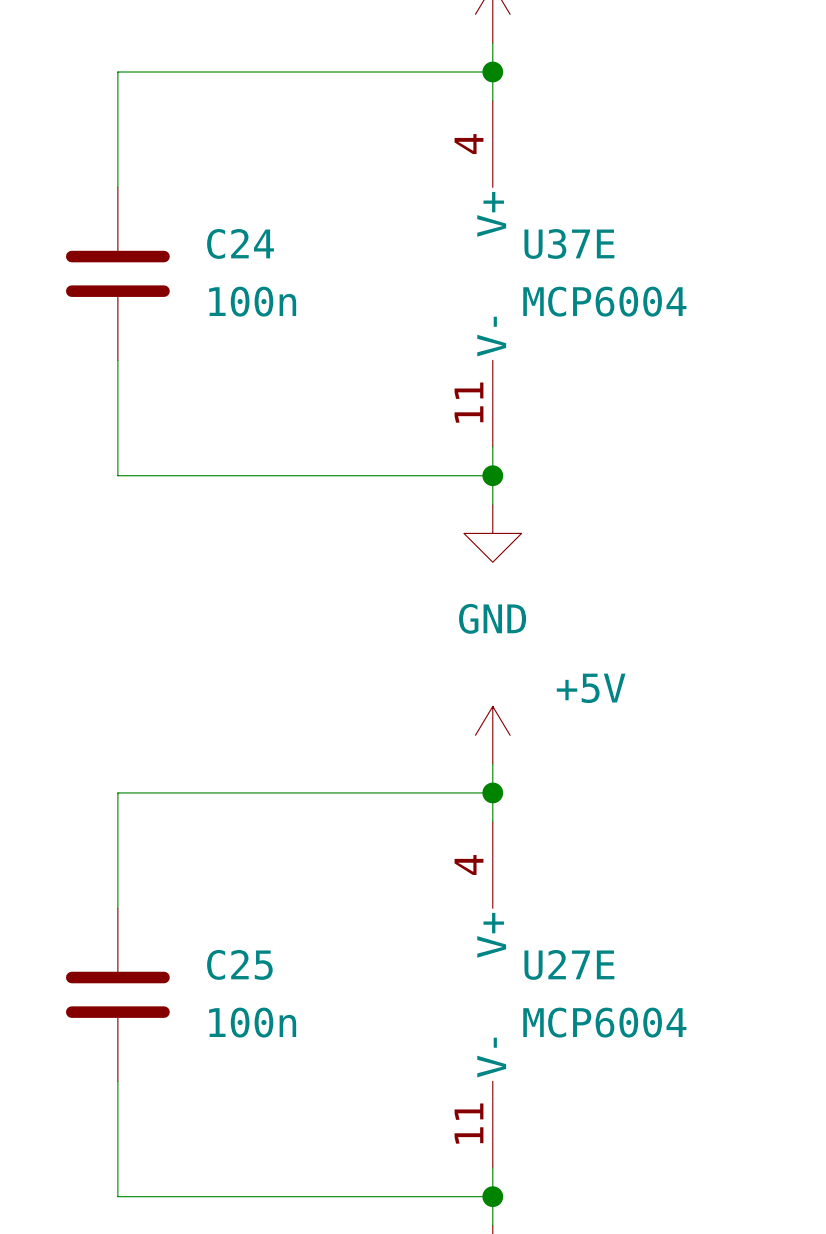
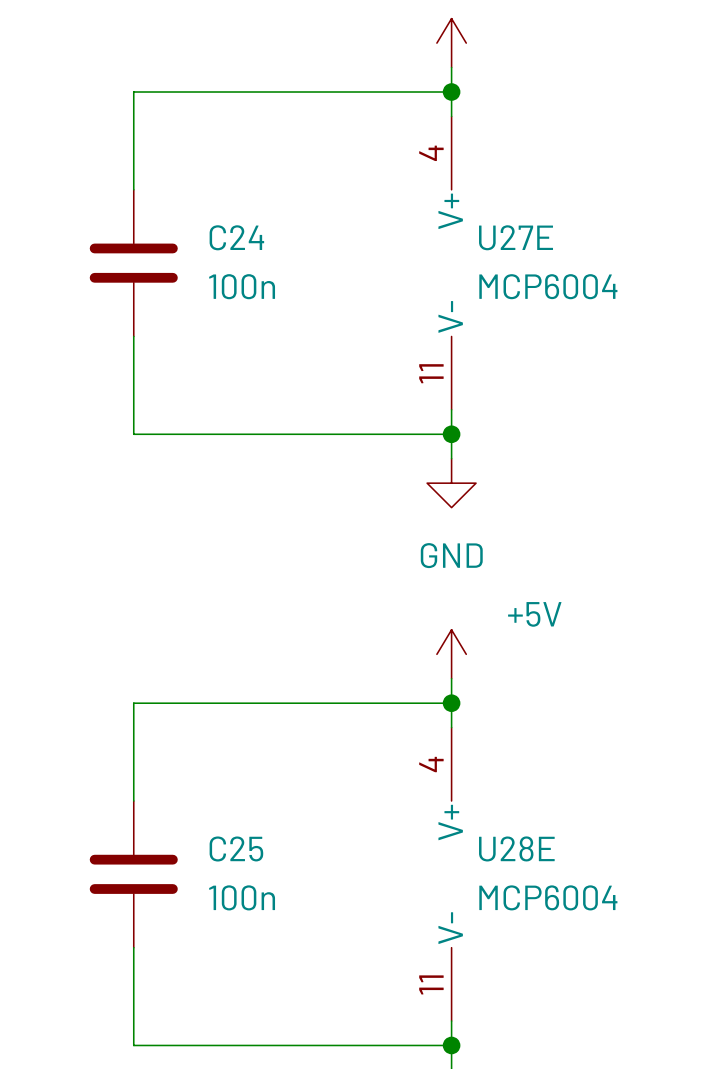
U37E name: U37E (569, 243) -> U27E (516, 237)
U27E name: U27E (569, 964) -> U28E (516, 848)

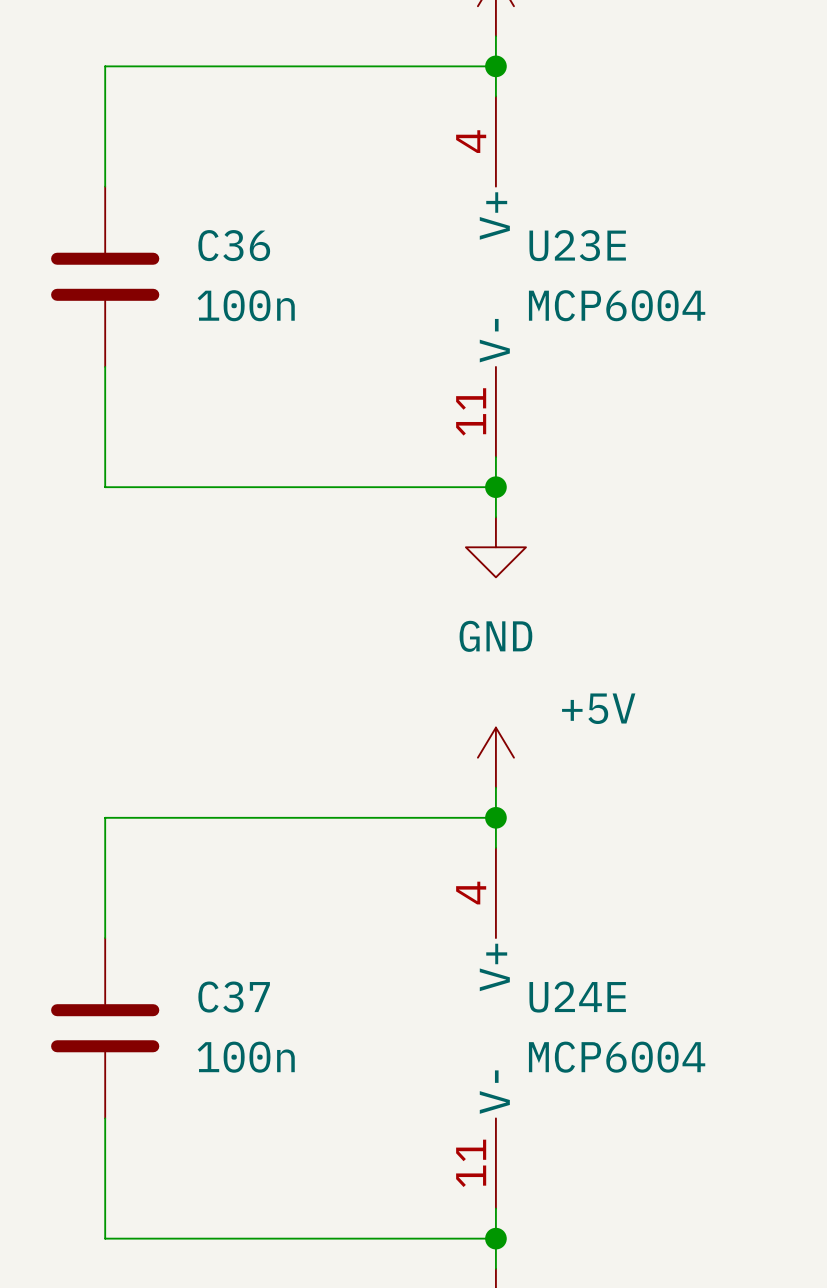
C24 name: C24 (236, 237) -> C36 (234, 245)
U27E name: U27E (516, 237) -> U23E (577, 245)
C25 name: C25 (236, 848) -> C37 (234, 997)
U28E name: U28E (516, 848) -> U24E (577, 997)

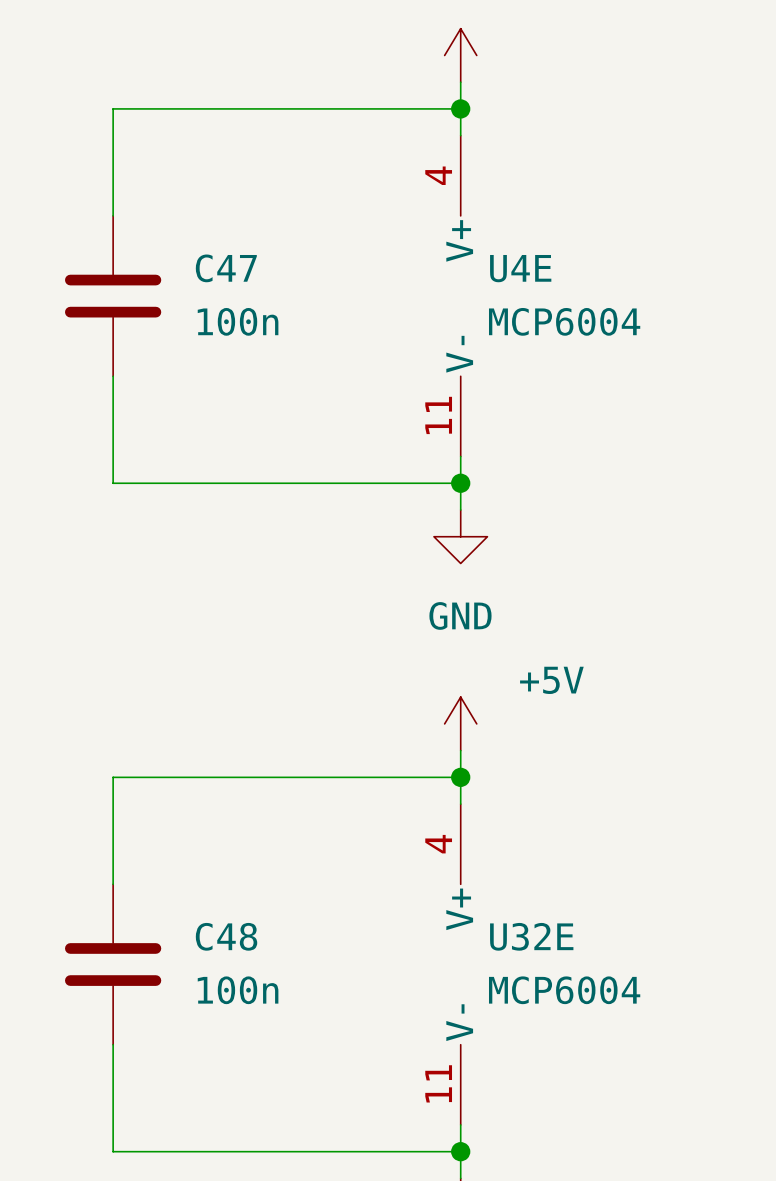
C36 name: C36 (234, 245) -> C47 (226, 268)
U23E name: U23E (577, 245) -> U4E (520, 268)
C37 name: C37 (234, 997) -> C48 (226, 936)
U24E name: U24E (577, 997) -> U32E (531, 936)

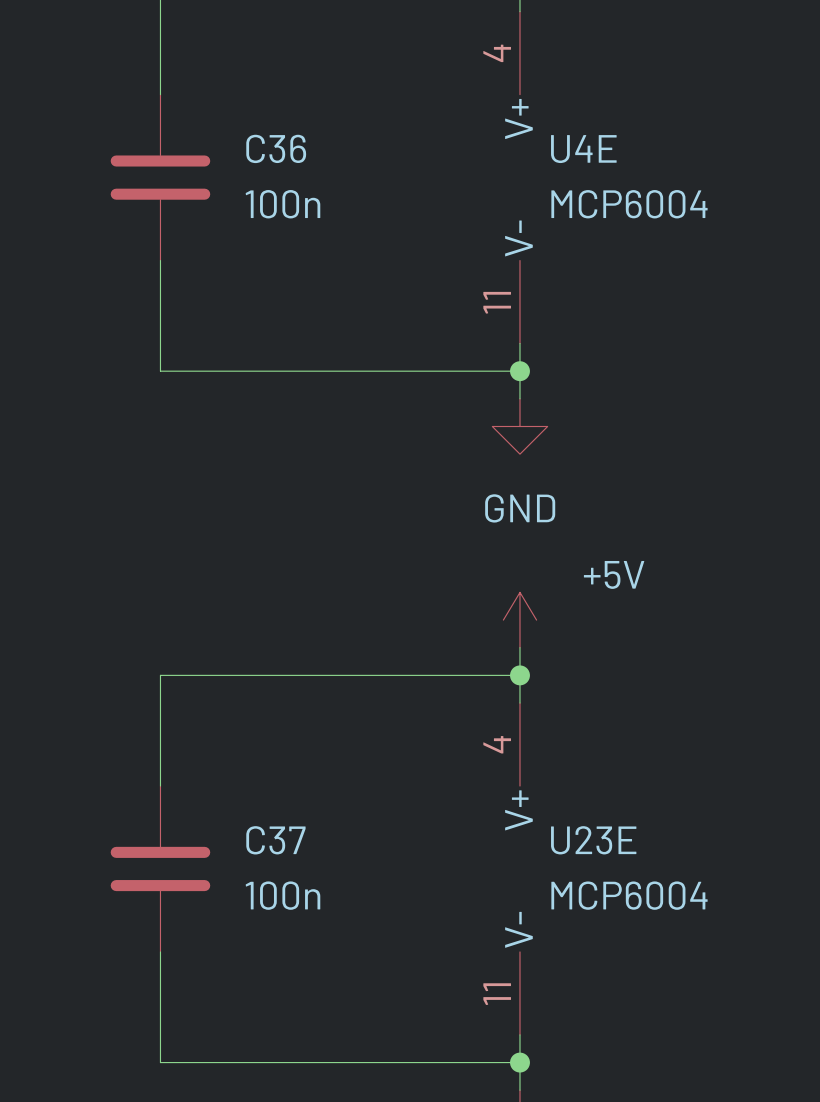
C47 name: C47 (226, 268) -> C36 (276, 148)
C48 name: C48 (226, 936) -> C37 (275, 840)
U32E name: U32E (531, 936) -> U23E (593, 840)

